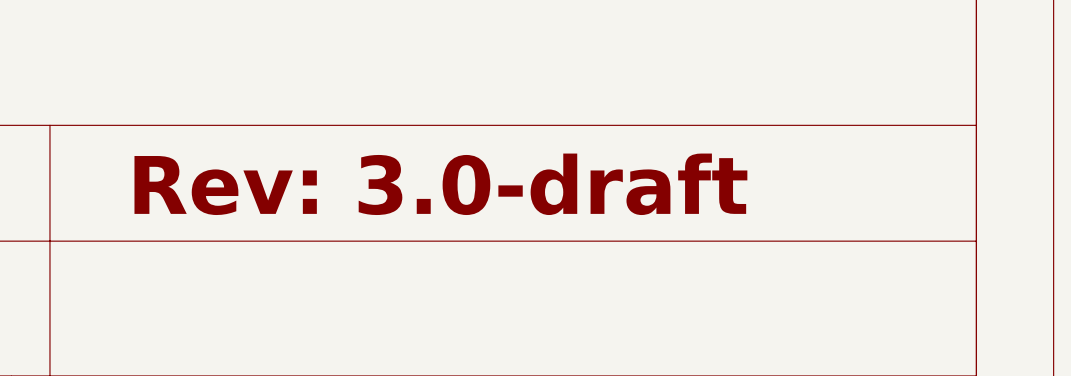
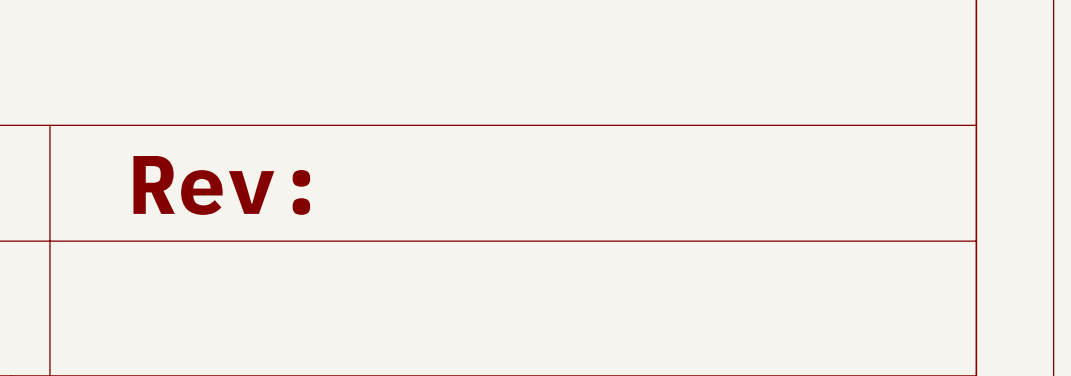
title block: Rev: 3.0-draft (440, 184) -> Rev: (221, 185)

